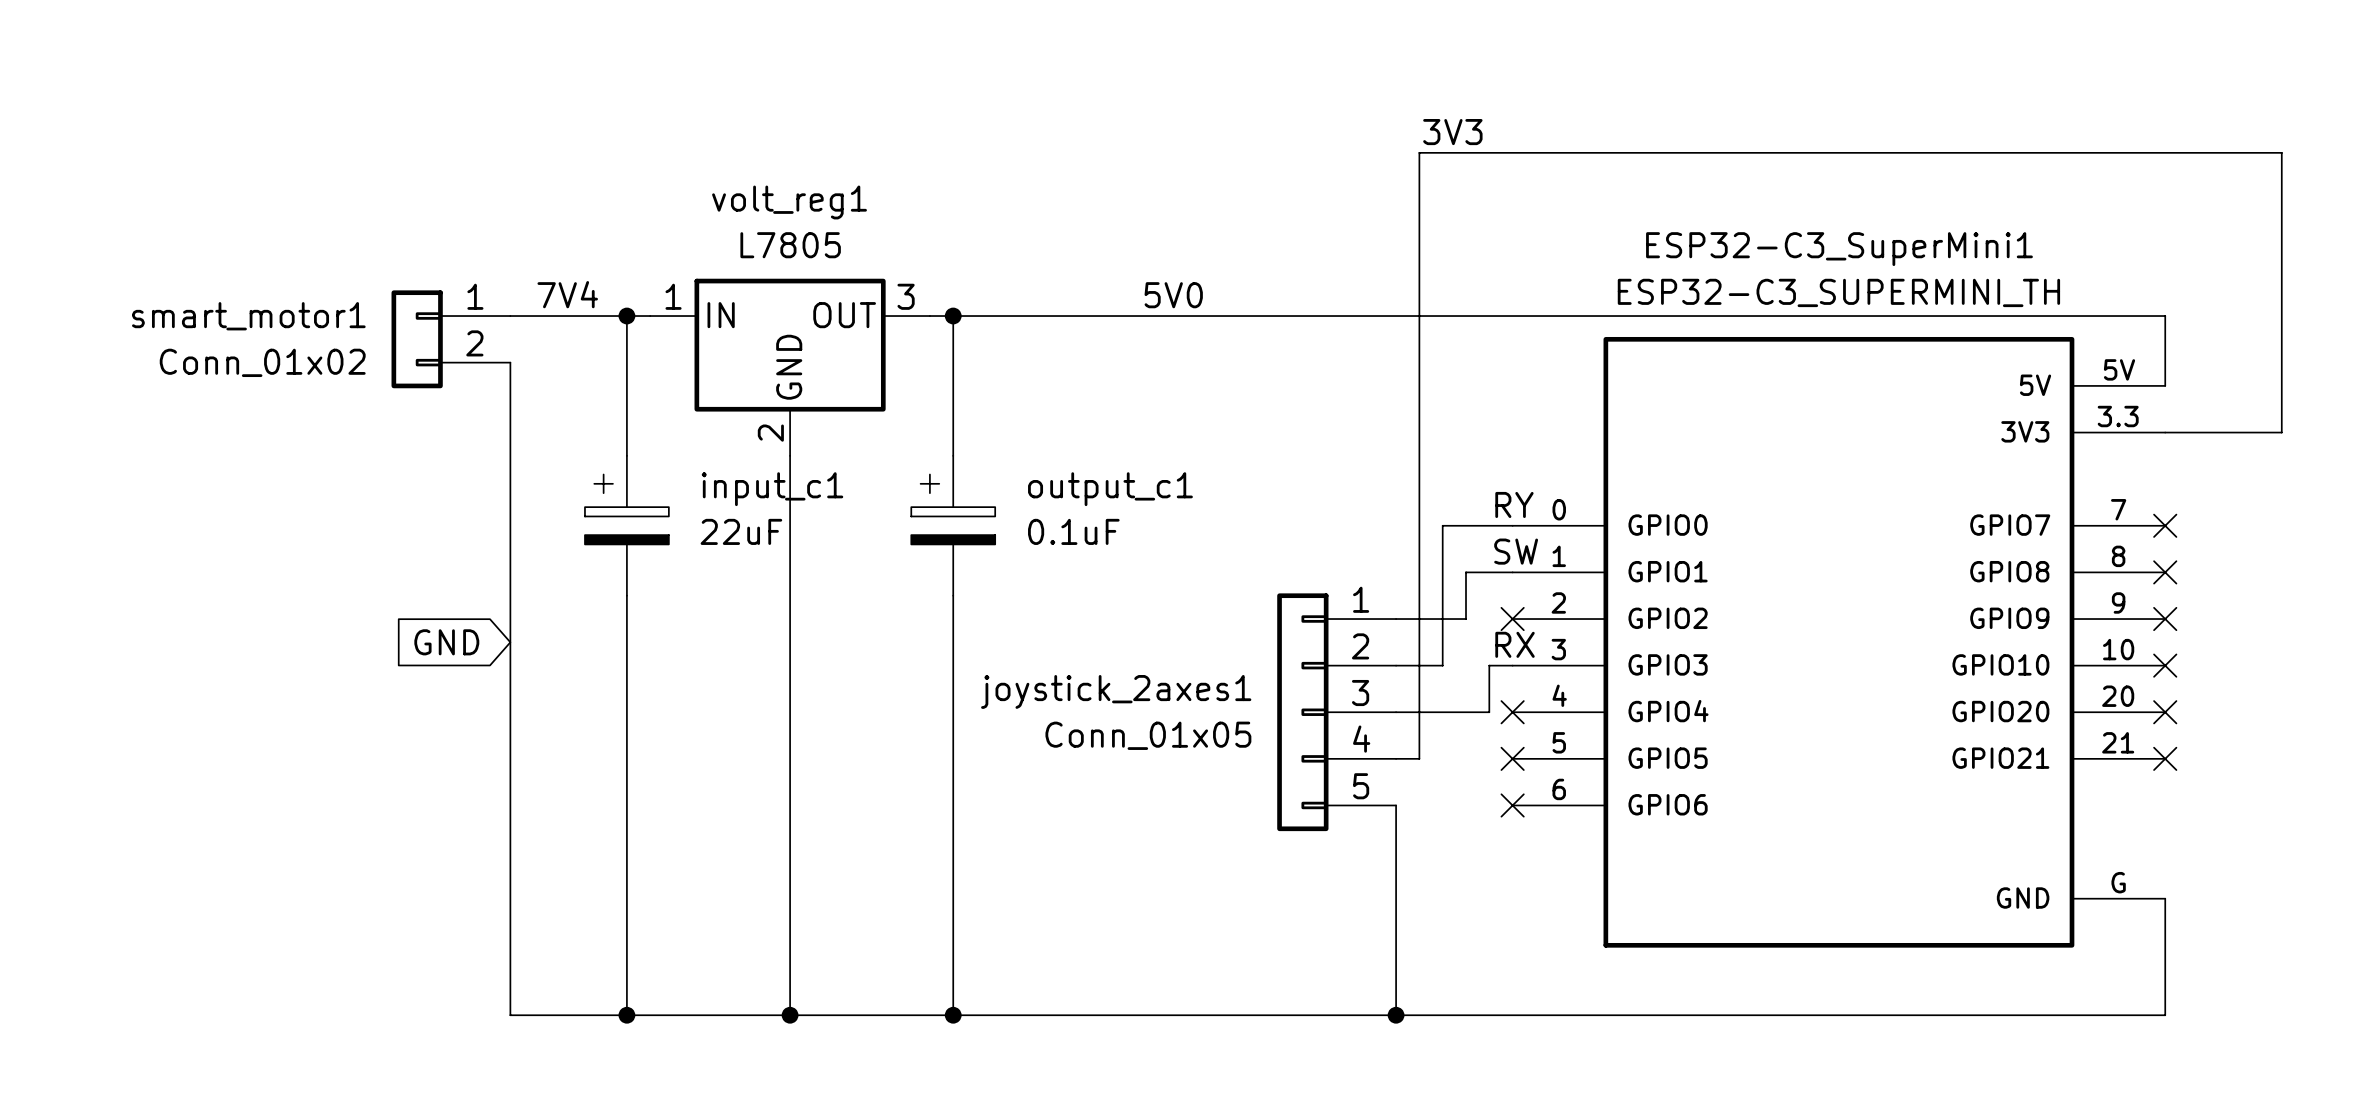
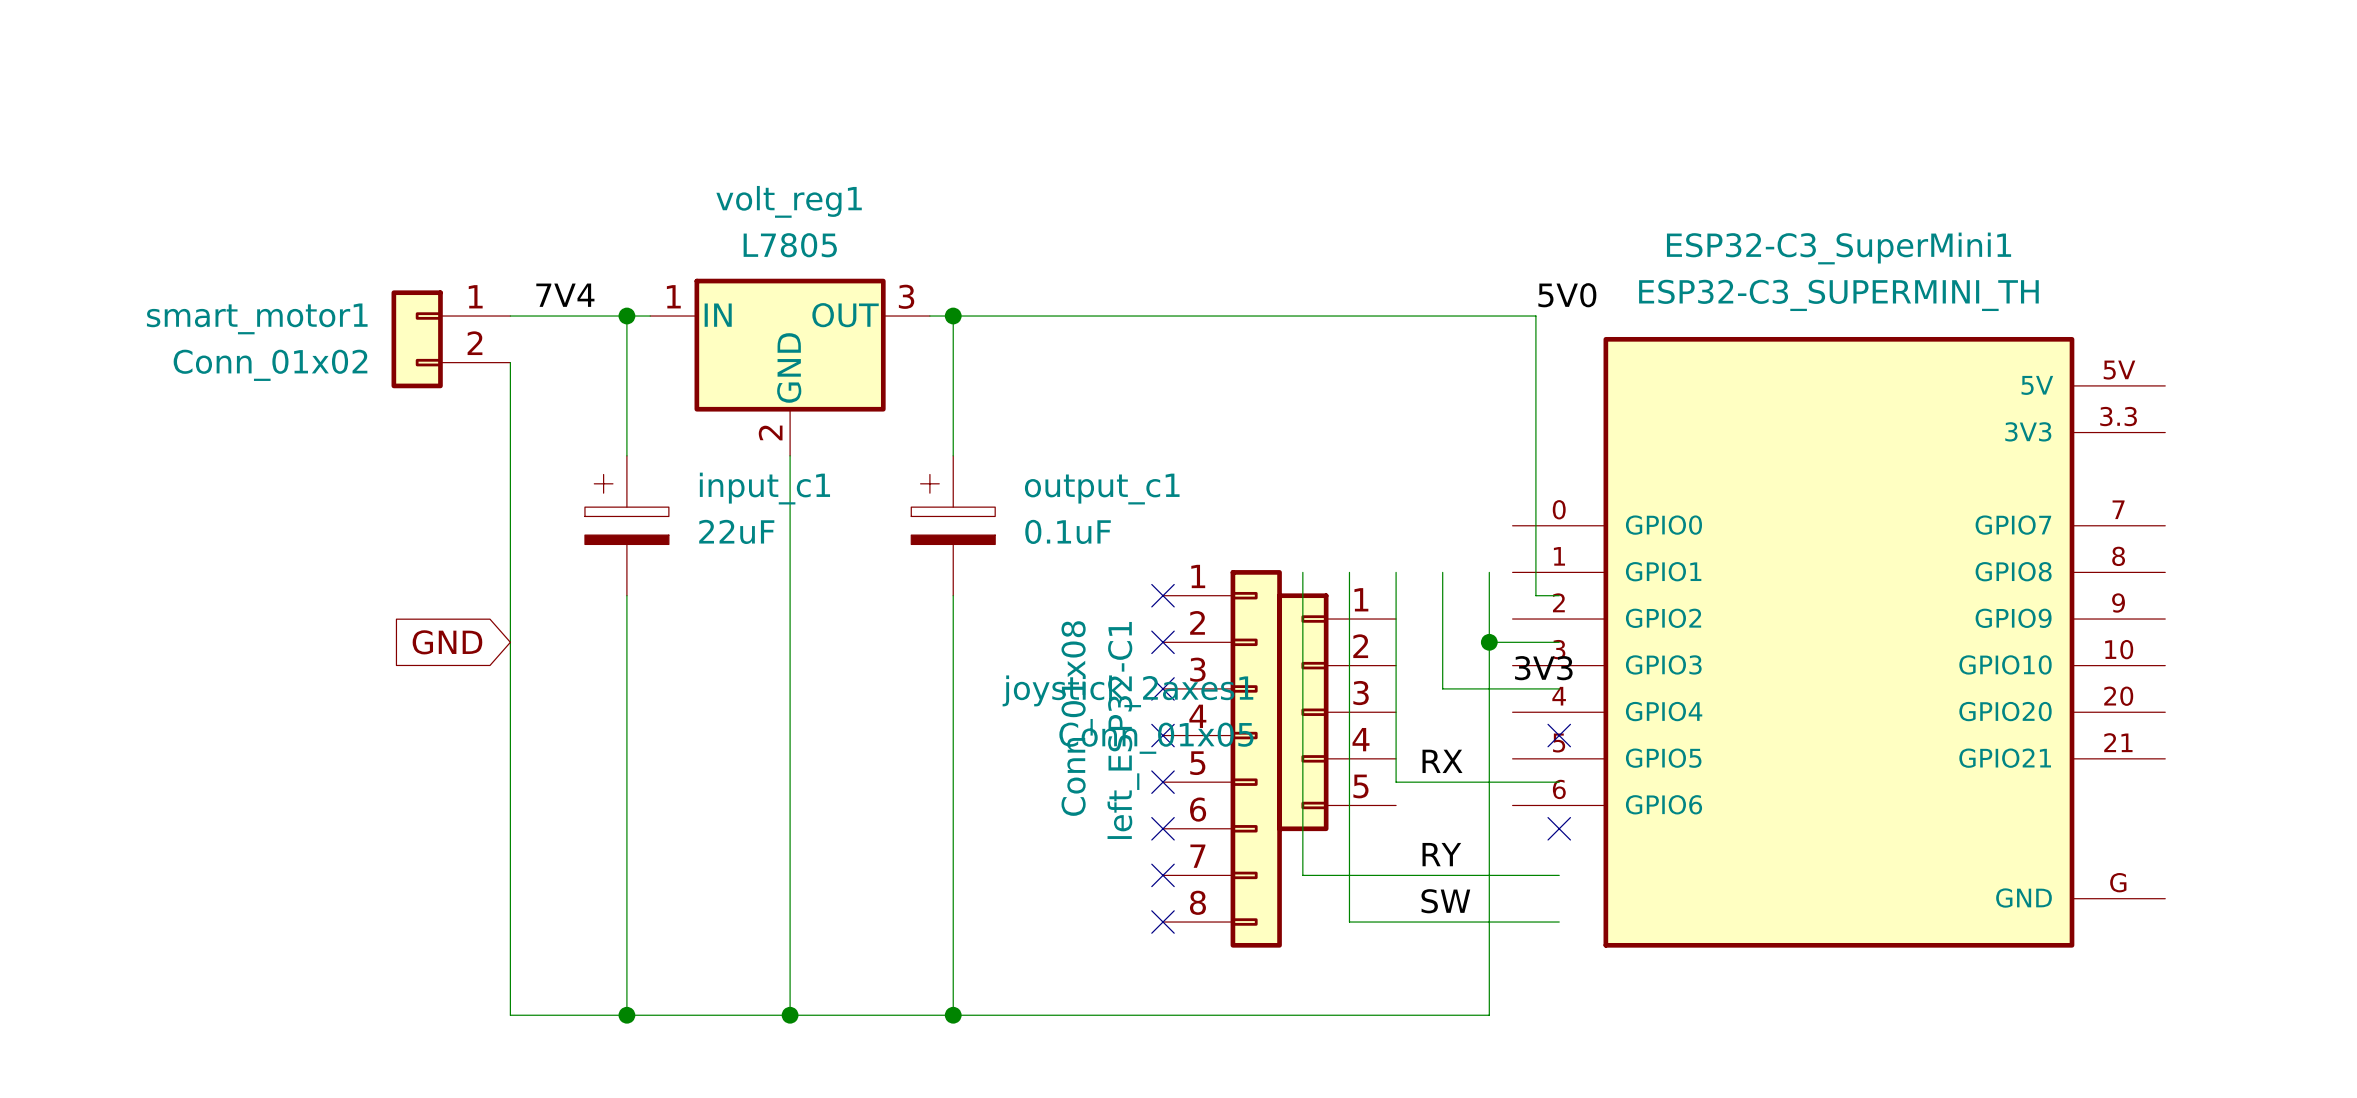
label: 3V3 (1452, 132) -> none
label position: 5V0 (1173, 295) -> 5V0 (1567, 295)
wire: (1535, 316) (2165, 316) (2165, 385) -> (1535, 316) (1535, 595) (1559, 595)
wire: (2165, 432) (2281, 432) (2281, 152) (1419, 152) (1419, 758) (1396, 758) -> none
label position: RY (1514, 504) -> RY (1441, 854)
wire: (1512, 525) (1442, 525) (1442, 572) -> none
no-connect mark: (2165, 525) -> none
label position: SW (1516, 551) -> SW (1445, 901)
wire: none -> (1302, 572) (1302, 875) (1559, 875)
wire: none -> (1349, 572) (1349, 922) (1559, 922)
wire: none -> (1396, 572) (1396, 782) (1559, 782)
wire: (1512, 572) (1466, 572) (1466, 619) (1396, 619) -> none
no-connect mark: (2165, 572) -> none
no-connect mark: none -> (1163, 595)
no-connect mark: (1512, 619) -> none
no-connect mark: (2165, 619) -> none
no-connect mark: none -> (1163, 642)
wire: none -> (1489, 642) (1559, 642)
junction: none -> (1489, 642)
label position: RX (1515, 644) -> RX (1442, 761)
wire: (1396, 665) (1442, 665) -> (1559, 688) (1442, 688) (1442, 665)
wire: (1489, 665) (1512, 665) -> (1489, 665) (1489, 572)
no-connect mark: (2165, 665) -> none
label: none -> 3V3 (1543, 668)
no-connect mark: none -> (1163, 688)
wire: (1396, 712) (1489, 712) -> (1489, 1015) (1489, 712)
no-connect mark: (1512, 712) -> none
no-connect mark: (2165, 712) -> none
no-connect mark: none -> (1163, 735)
no-connect mark: none -> (1559, 735)
left_ESP32-C1: none -> Conn_01x08 (1222, 758)
no-connect mark: (1512, 758) -> none
no-connect mark: (2165, 758) -> none
no-connect mark: none -> (1163, 782)
wire: (1396, 805) (1396, 1015) -> none
no-connect mark: (1512, 805) -> none
no-connect mark: none -> (1163, 828)
no-connect mark: none -> (1559, 828)
no-connect mark: none -> (1163, 875)
wire: (2165, 898) (2165, 1015) (1489, 1015) -> none
no-connect mark: none -> (1163, 922)
junction: (1396, 1015) -> none

